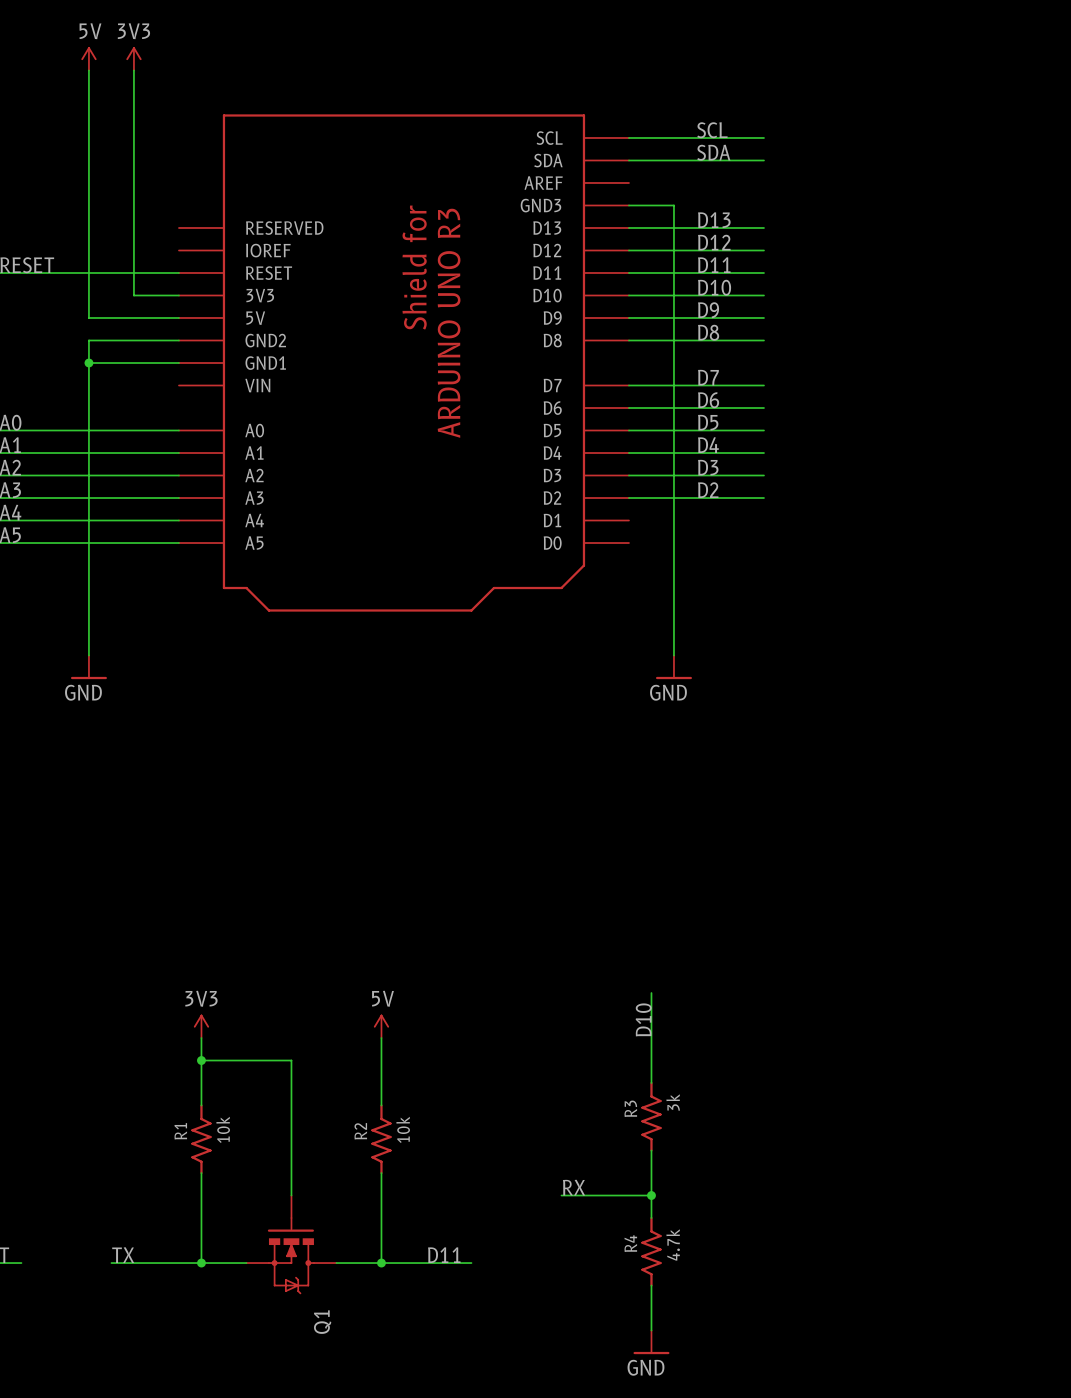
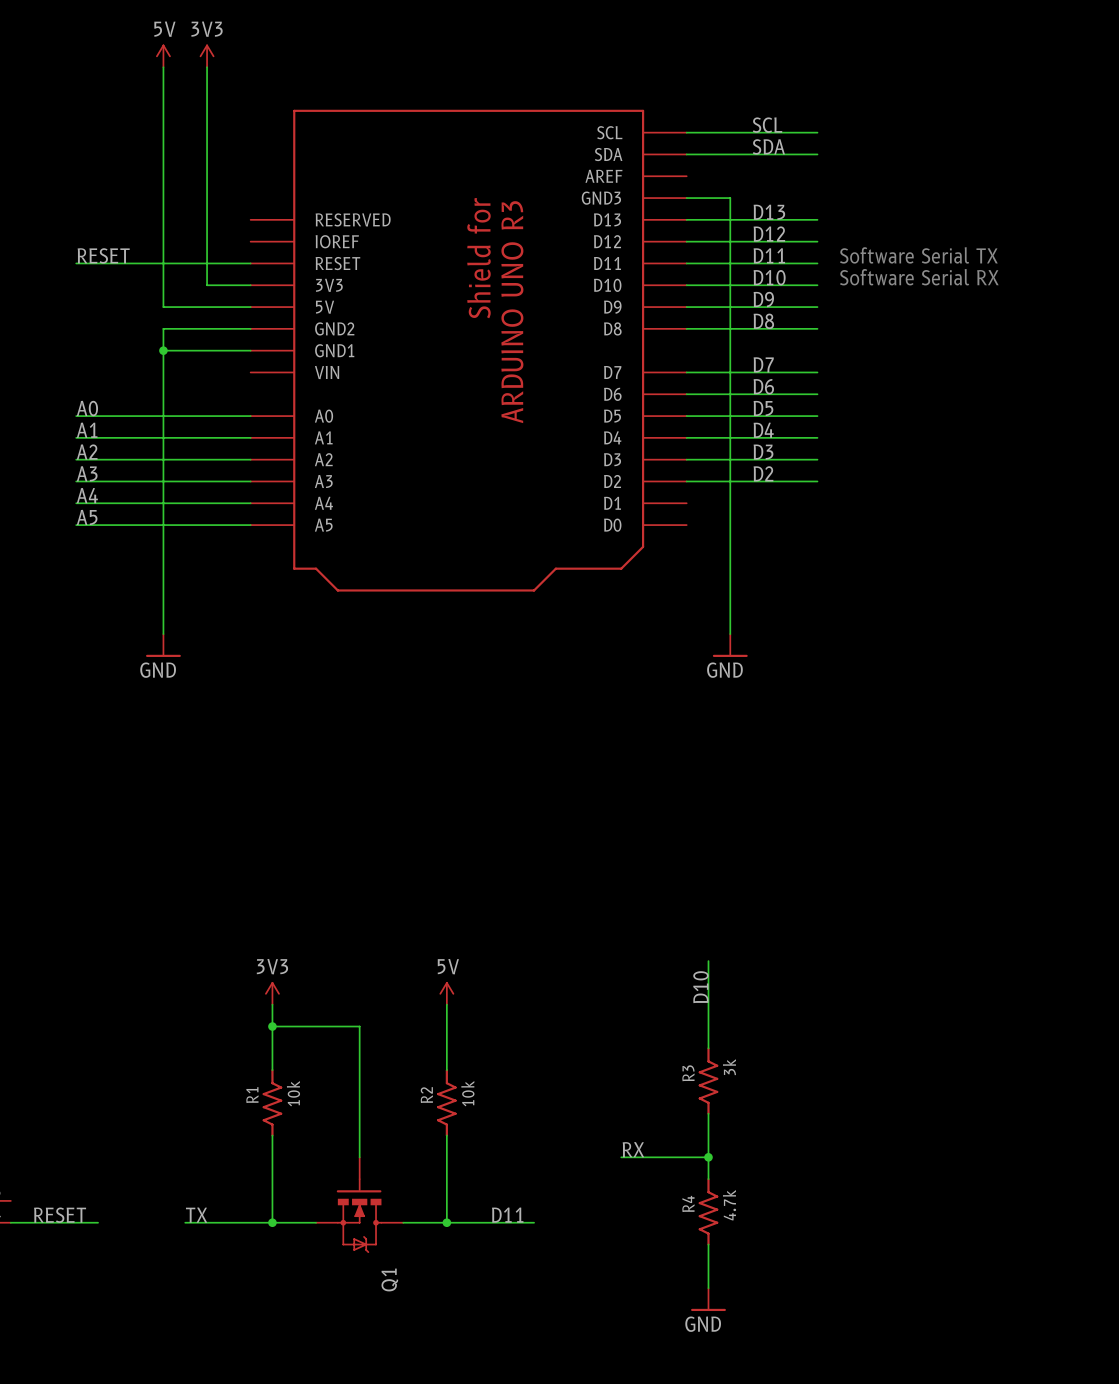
text: none -> Software Serial TX (918, 255)
text: none -> Software Serial RX (919, 277)

